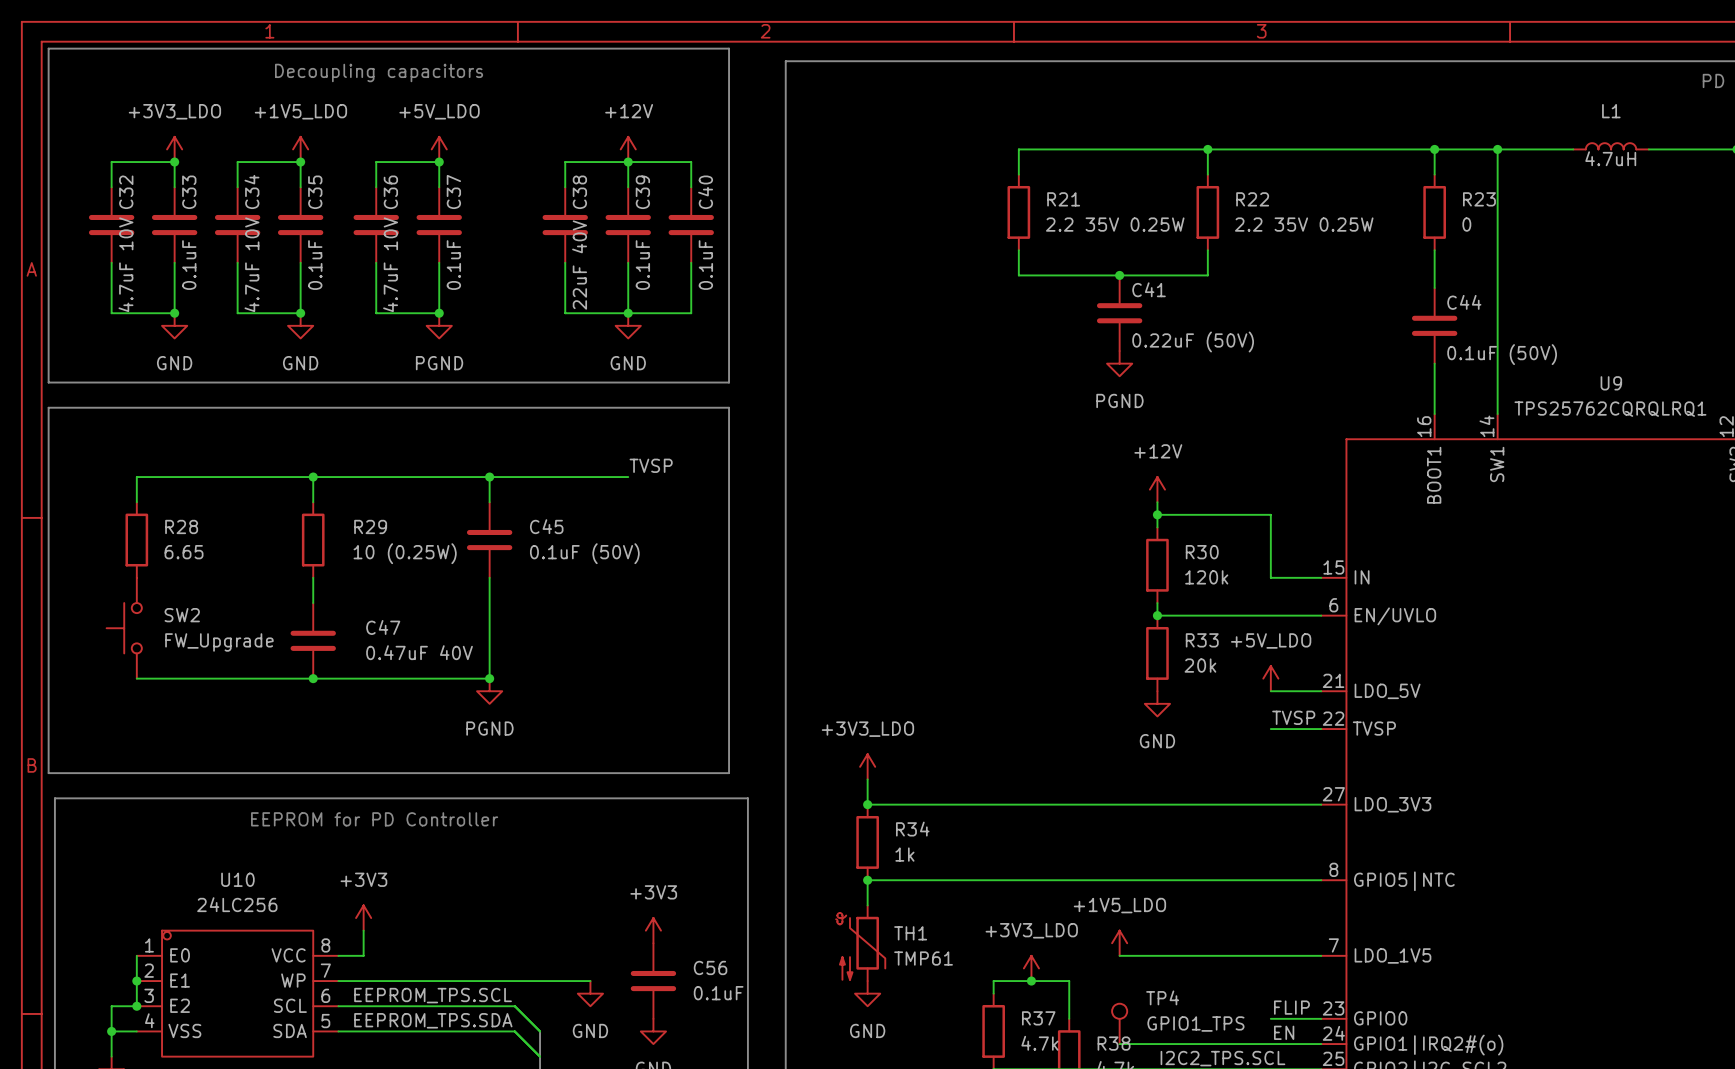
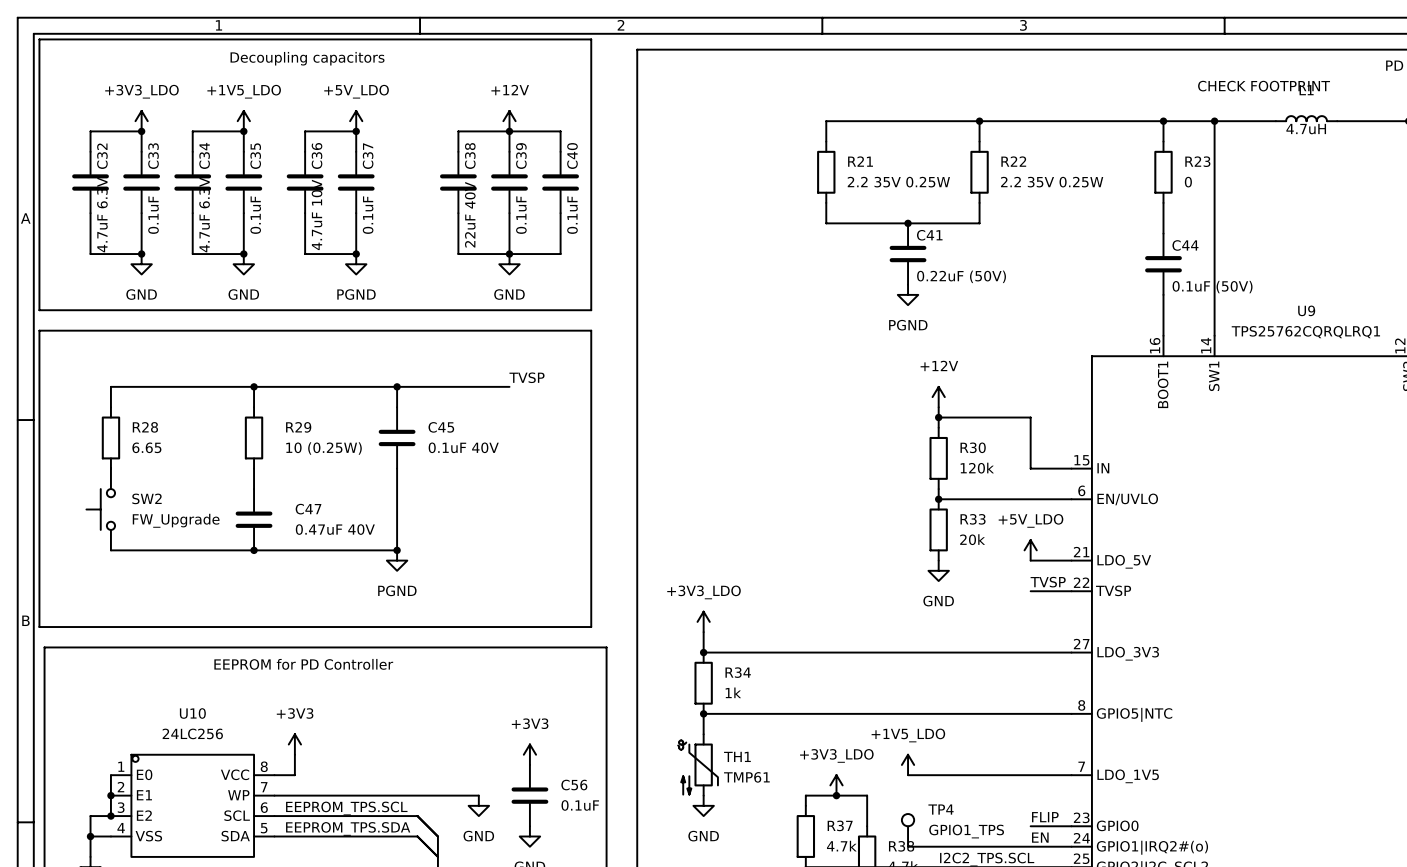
text: none -> CHECK FOOTPRINT (1264, 86)
C32 value: 4.7uF 10V (125, 264) -> 4.7uF 6.3V (102, 214)
C34 value: 4.7uF 10V (251, 264) -> 4.7uF 6.3V (204, 214)
C45 value: 0.1uF (50V) (584, 553) -> 0.1uF 40V (463, 447)

